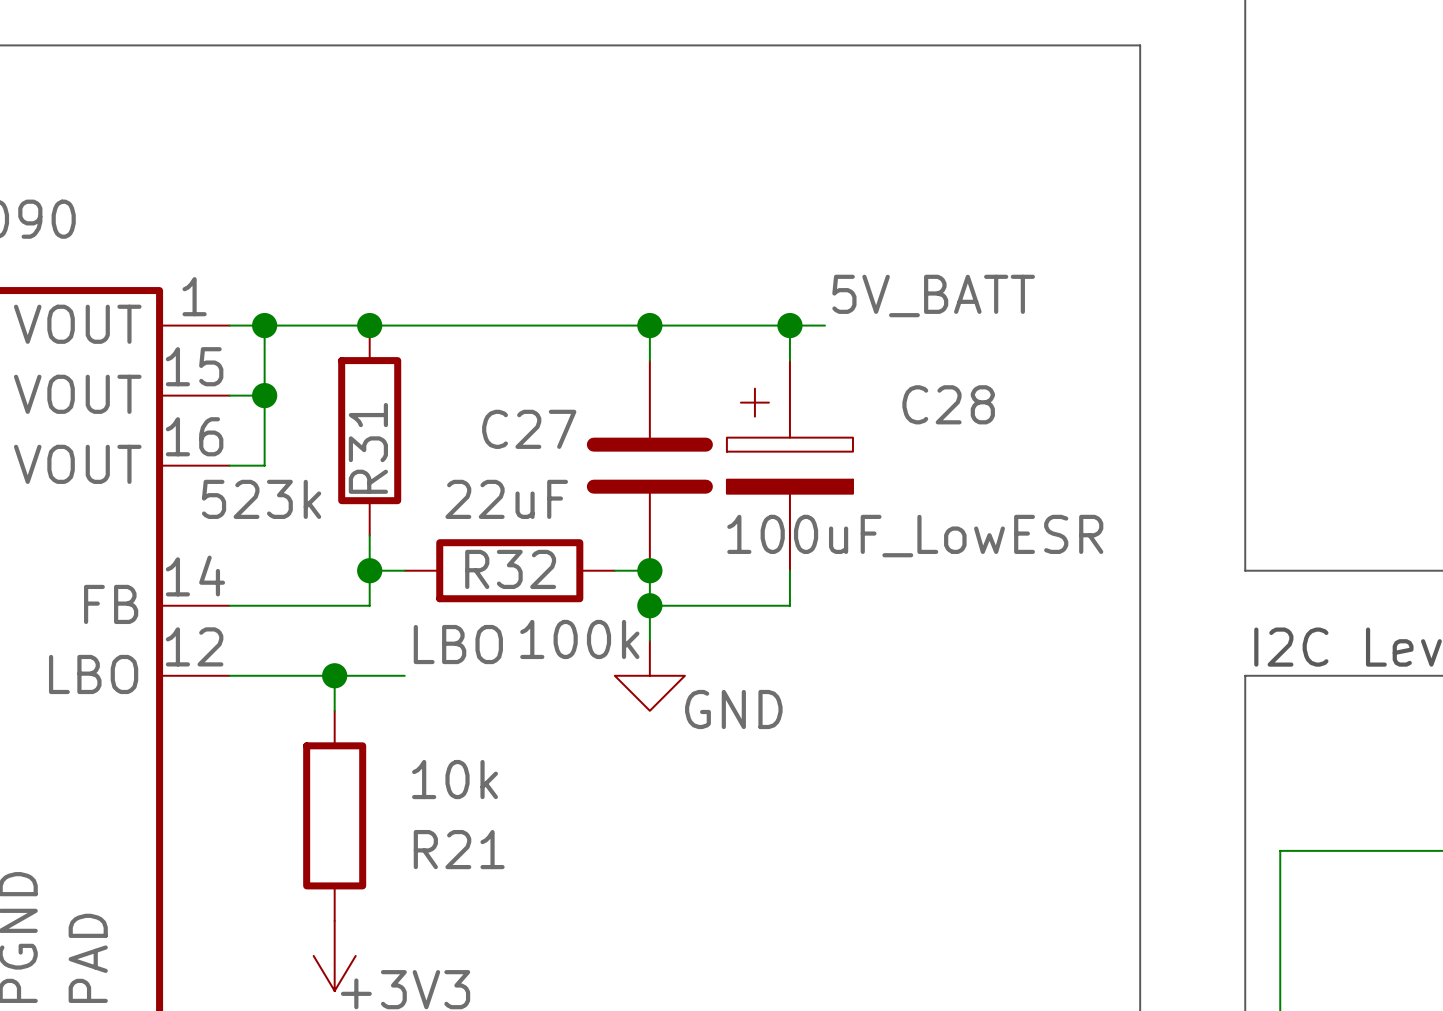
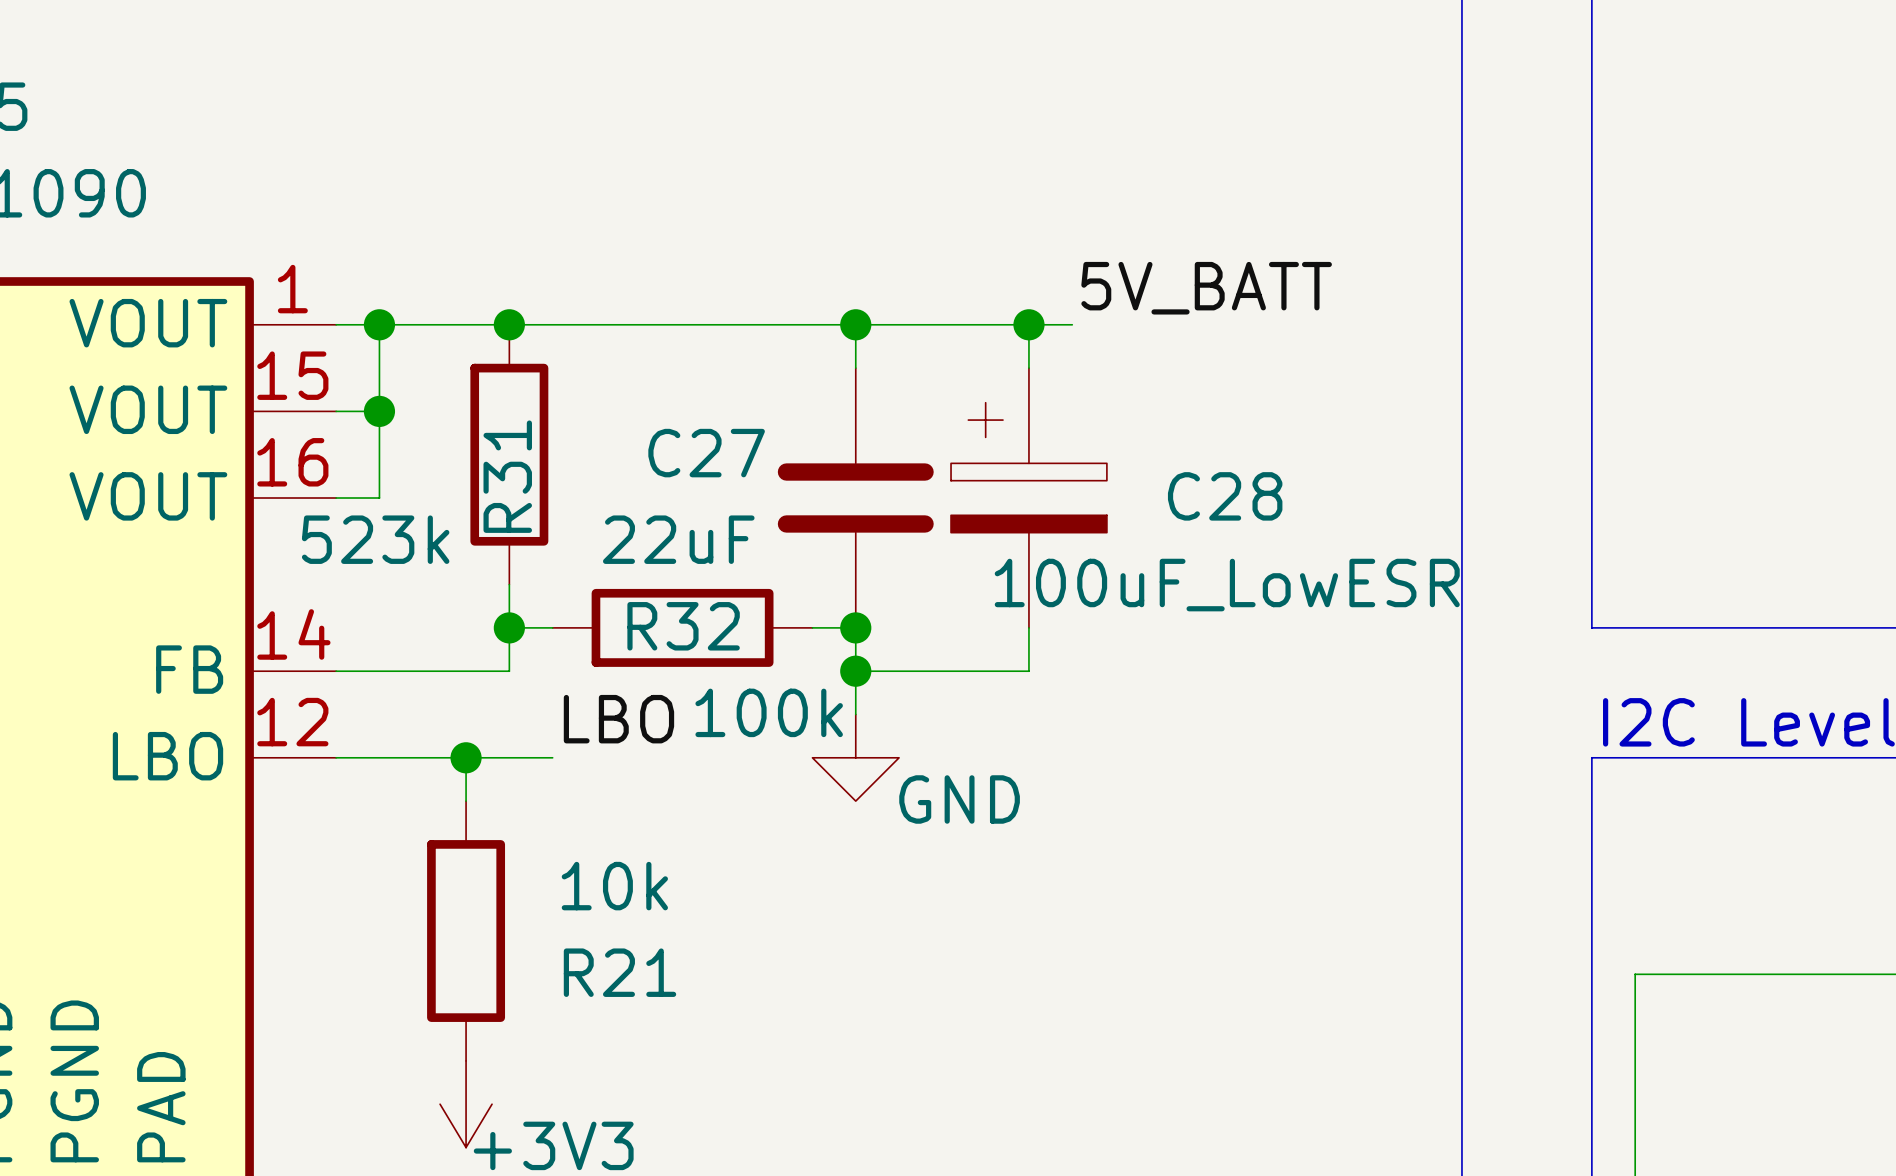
C28 name position: C28 (948, 404) -> C28 (1225, 496)
C28 value position: 100uF_LowESR (915, 536) -> 100uF_LowESR (1227, 585)

